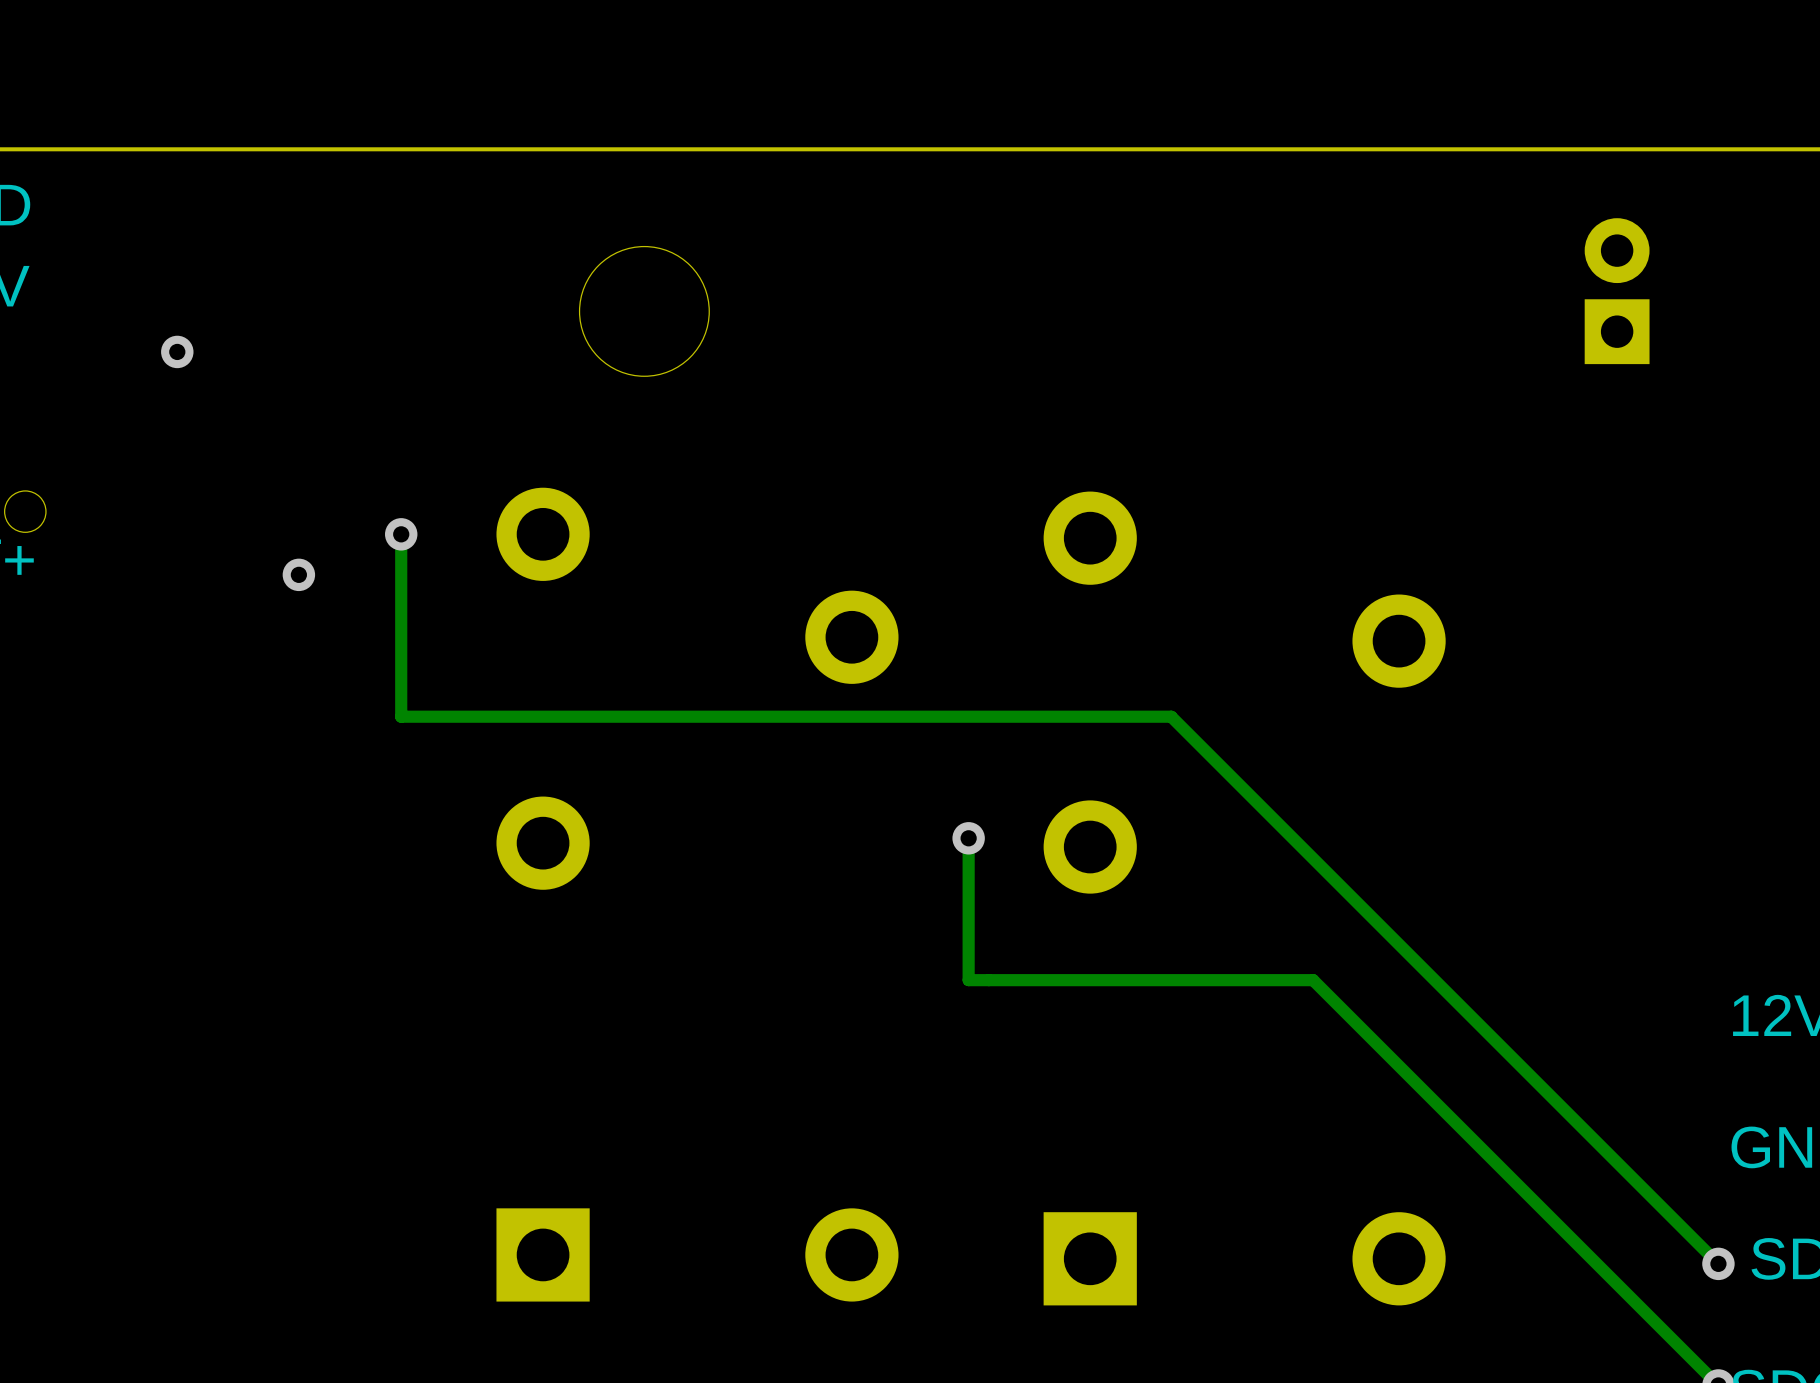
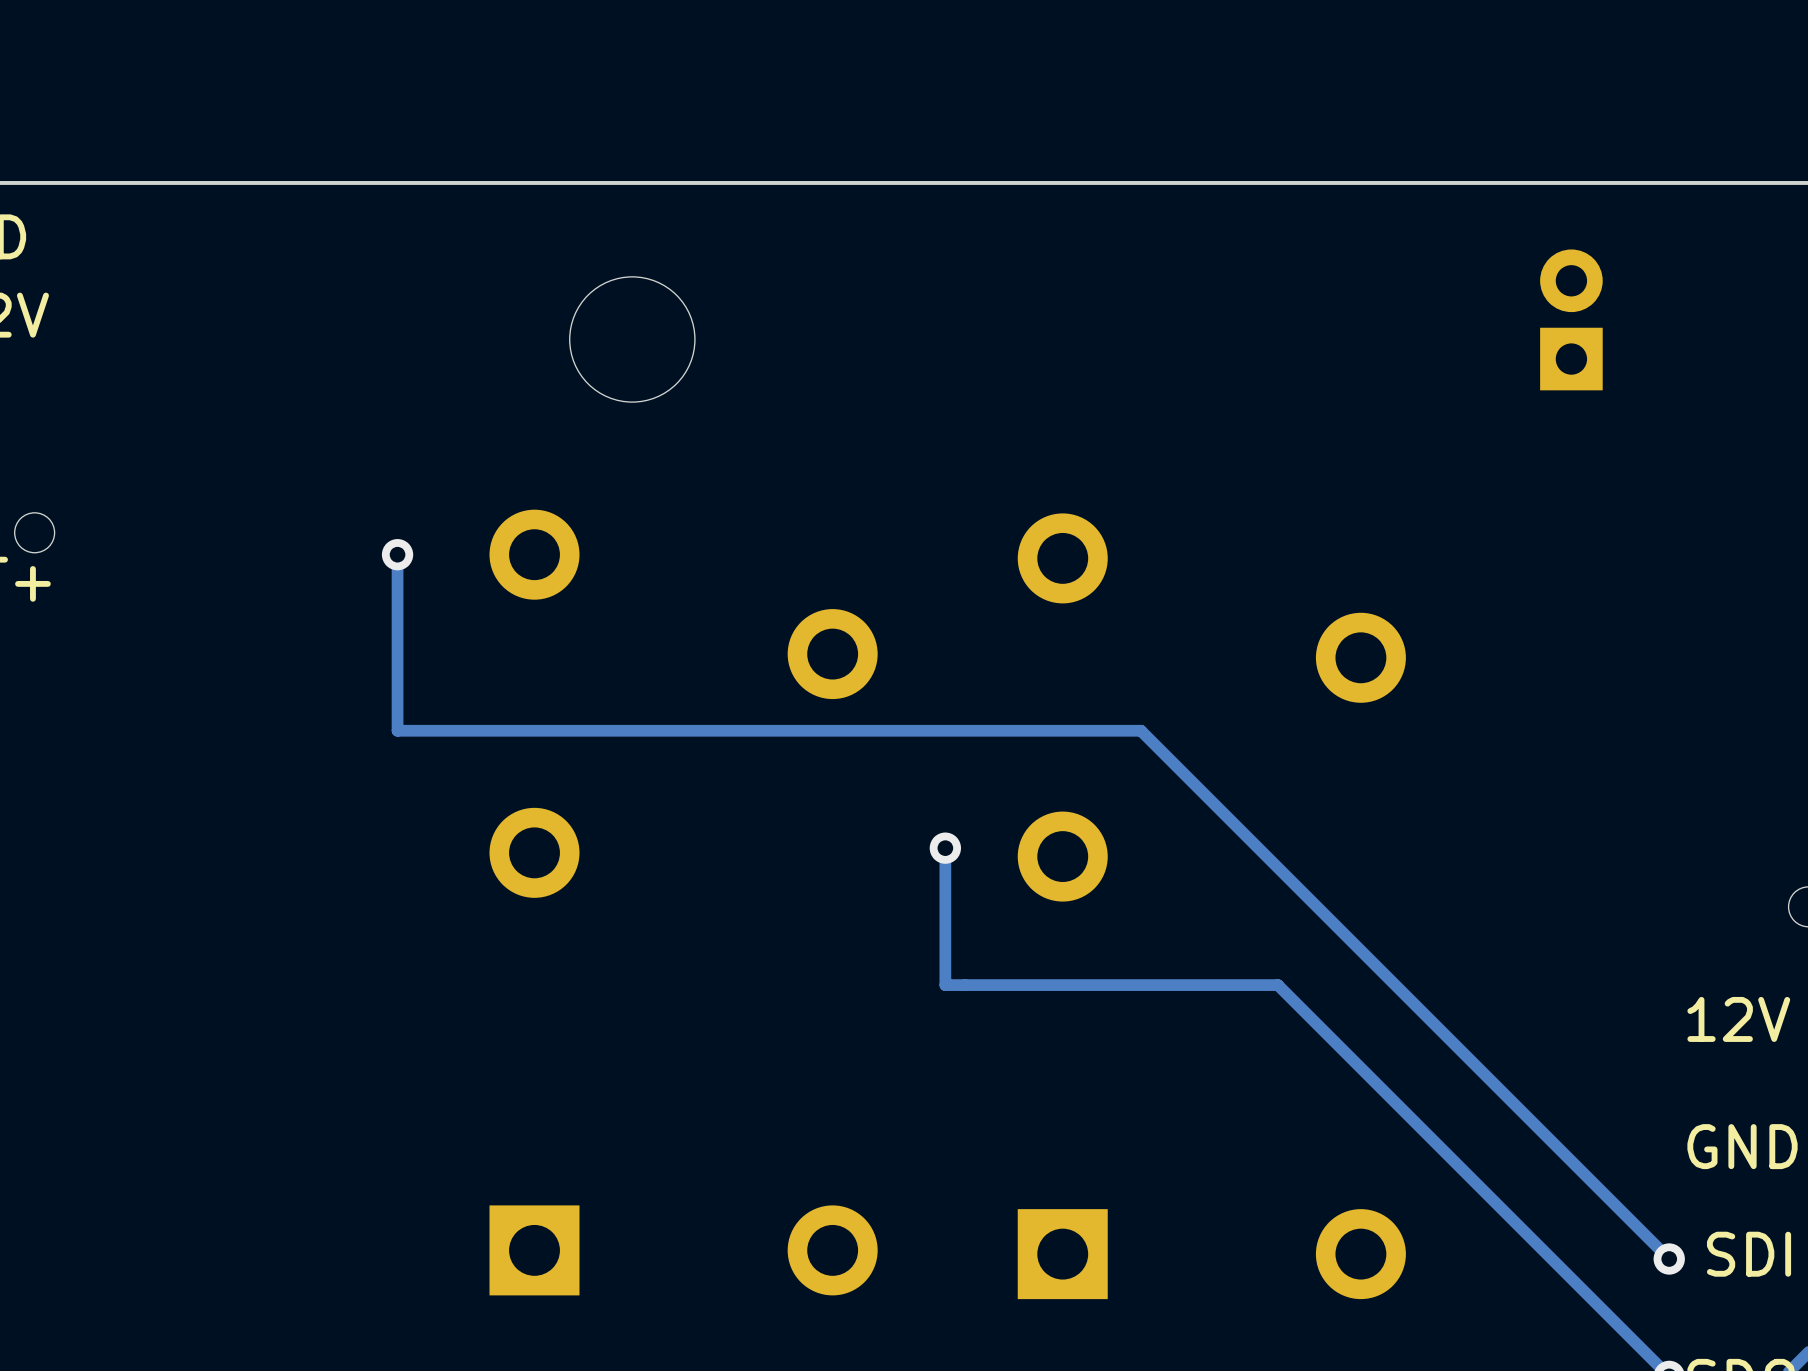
via: (177, 351) -> none
via: (298, 574) -> none

